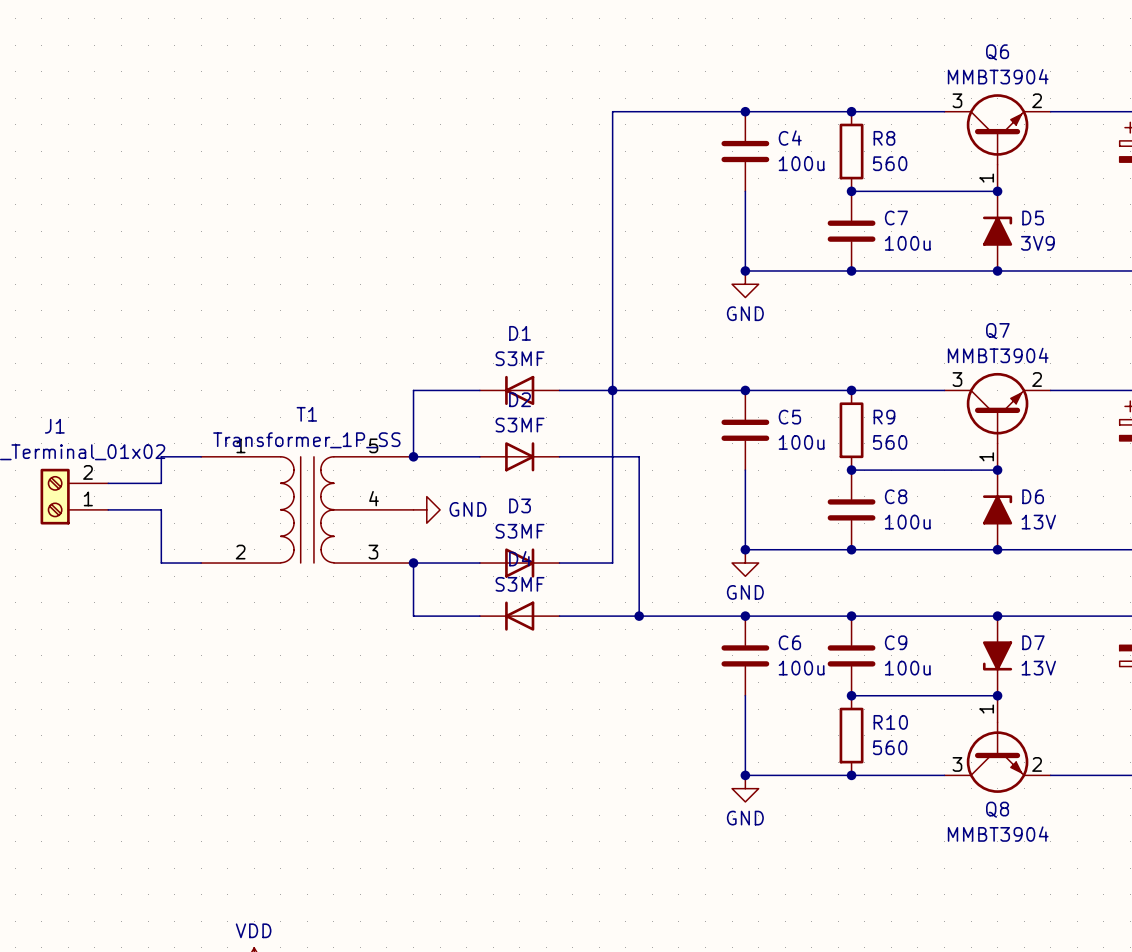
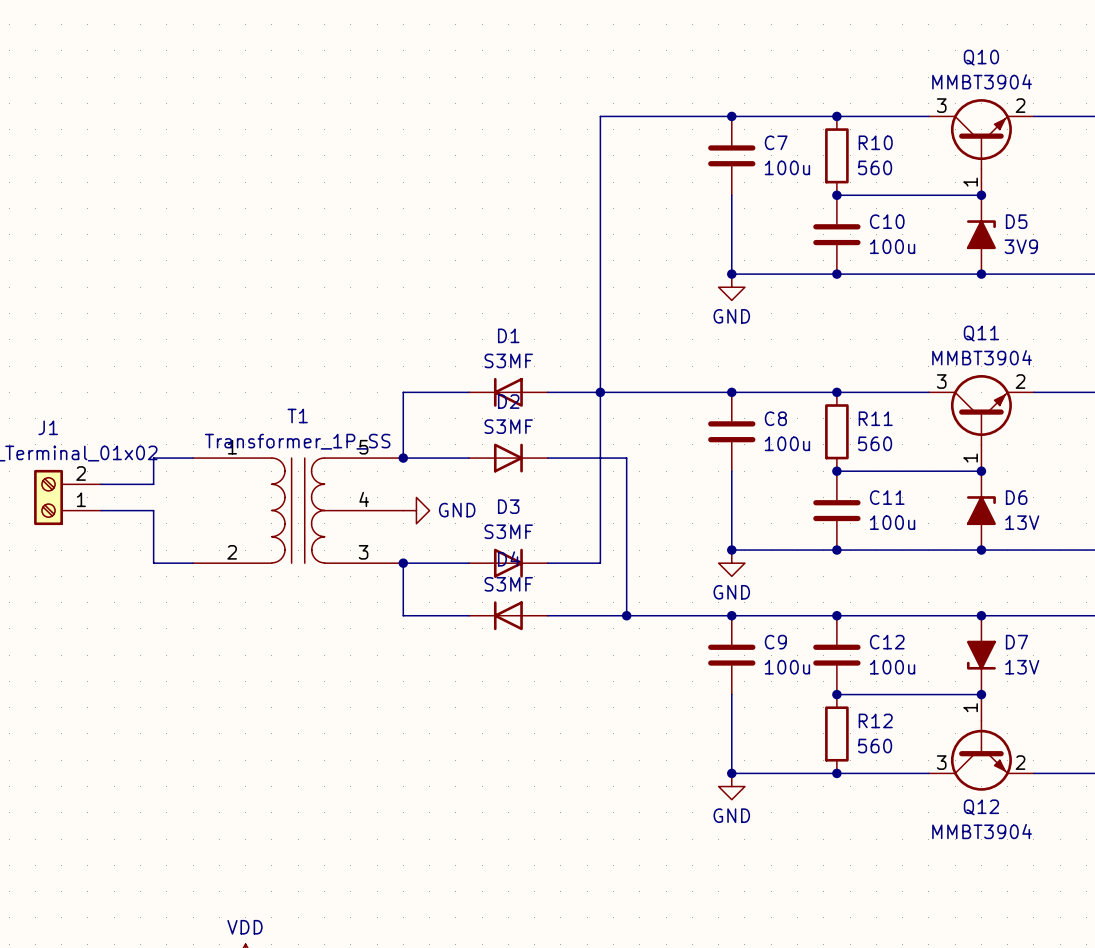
Q6 name: Q6 (997, 52) -> Q10 (981, 57)
C4 name: C4 (790, 138) -> C7 (776, 142)
R8 name: R8 (884, 138) -> R10 (875, 142)
C7 name: C7 (896, 218) -> C10 (887, 221)
Q7 name: Q7 (997, 331) -> Q11 (981, 333)
C5 name: C5 (789, 417) -> C8 (775, 418)
R9 name: R9 (884, 417) -> R11 (875, 418)
C8 name: C8 (896, 496) -> C11 (887, 497)
C6 name: C6 (789, 642) -> C9 (775, 642)
C9 name: C9 (896, 642) -> C12 (887, 642)
R10 name: R10 (890, 722) -> R12 (875, 720)
Q8 name: Q8 (997, 809) -> Q12 (981, 807)

